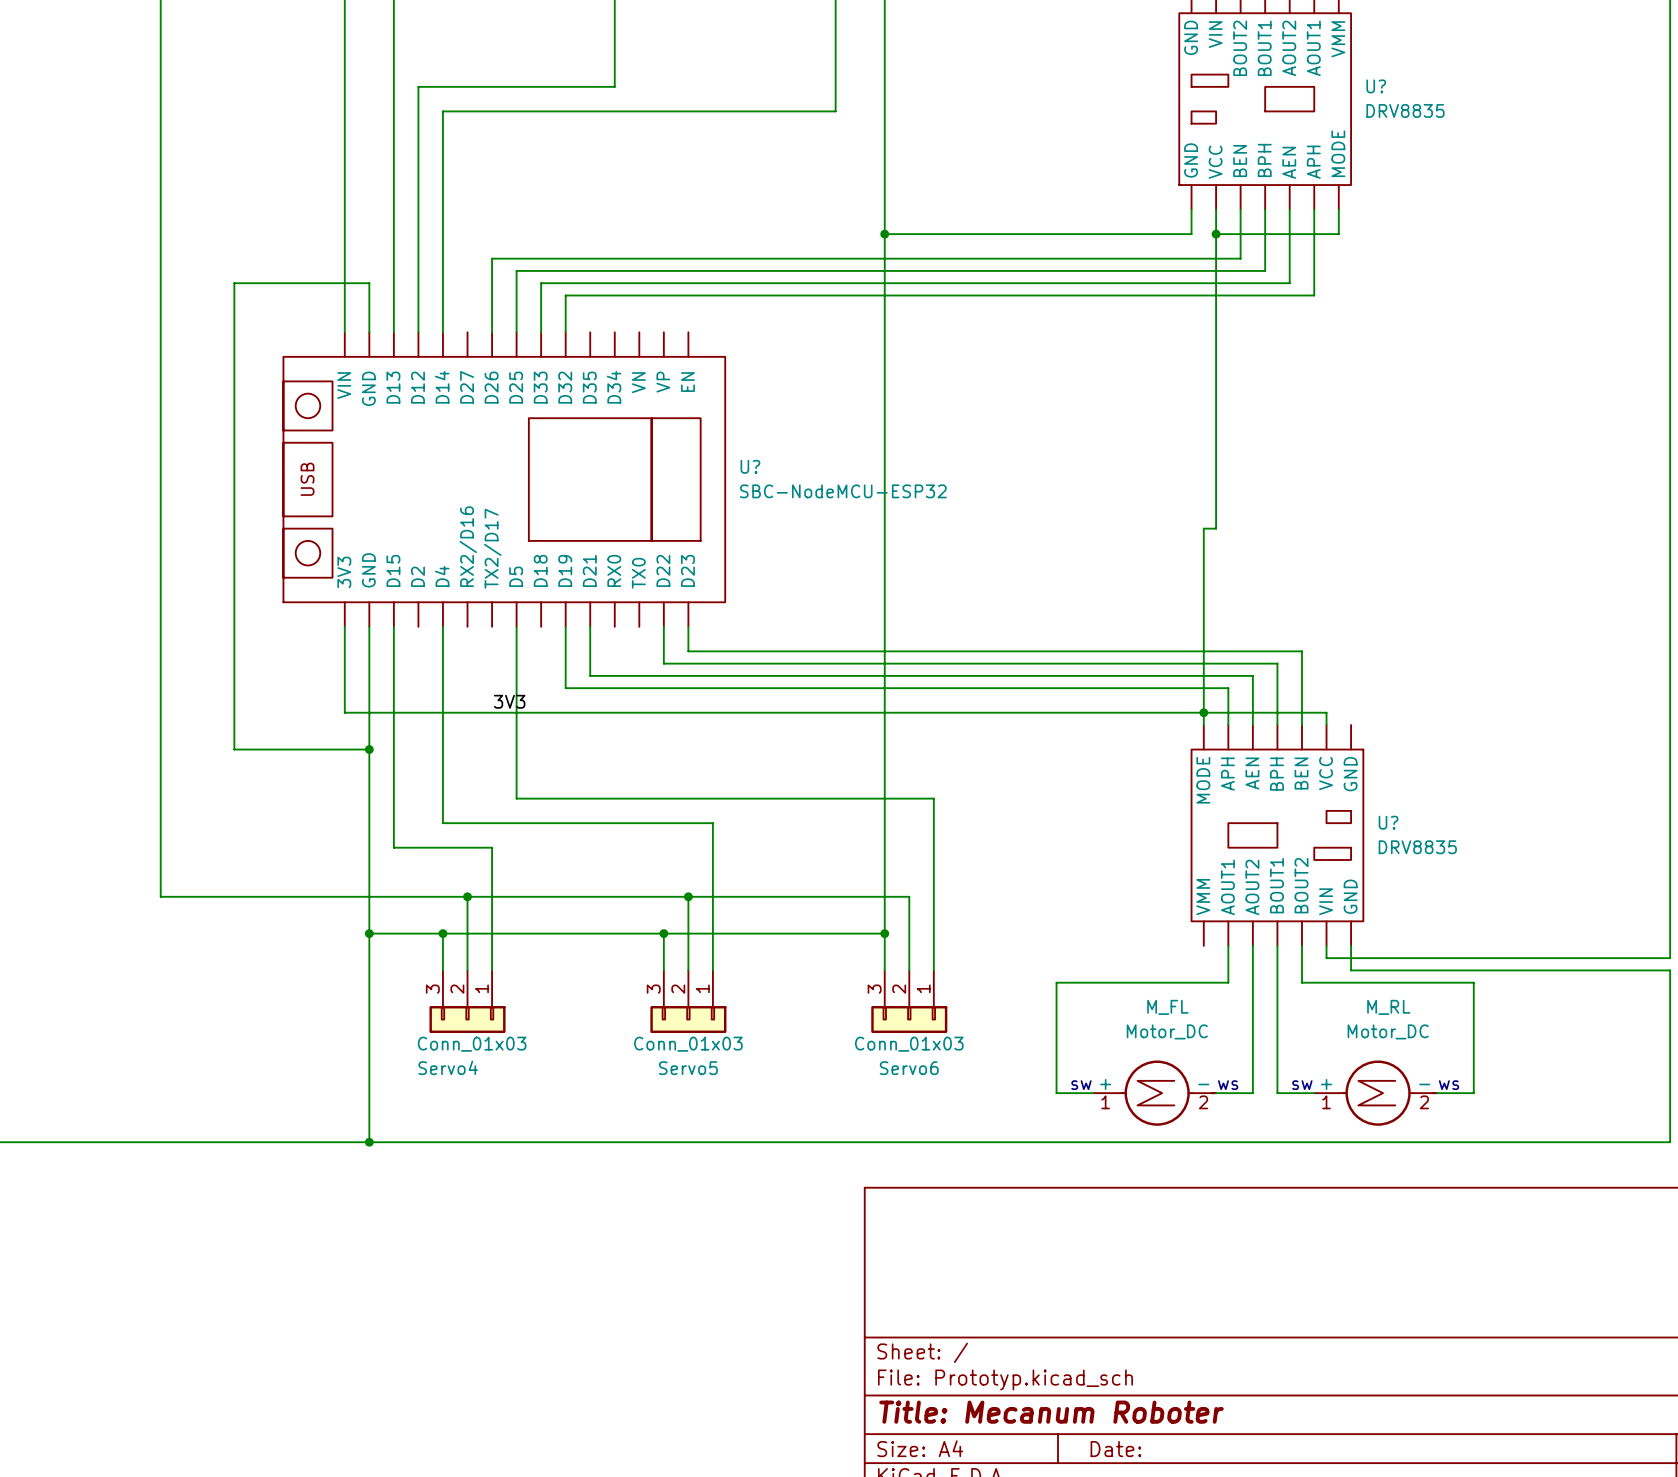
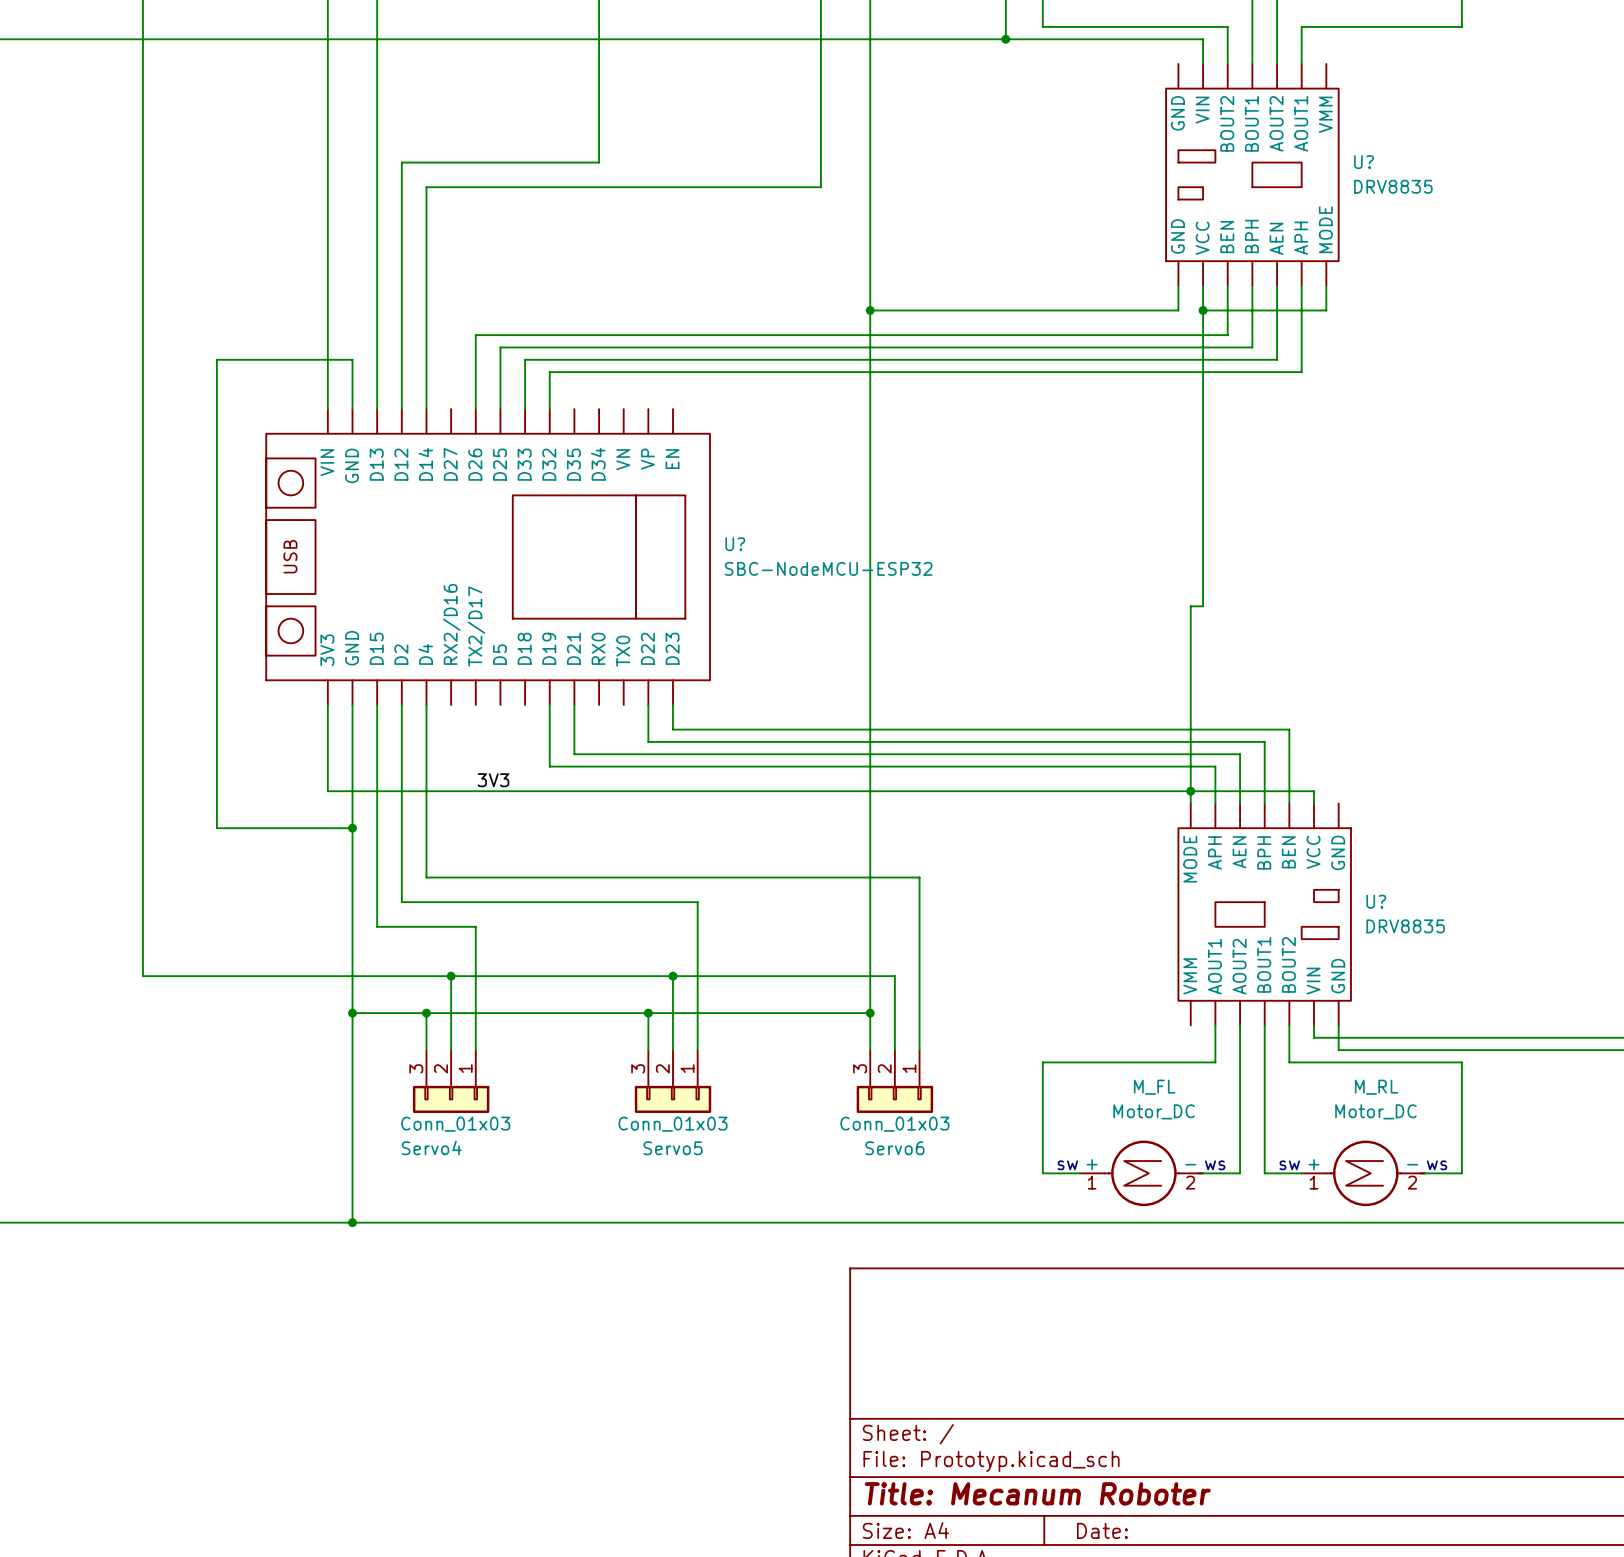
wire: none -> (401, 704) (401, 902) (426, 902)
wire: (516, 626) (516, 798) -> none
wire: (442, 798) (442, 823) -> (426, 877) (500, 877)

